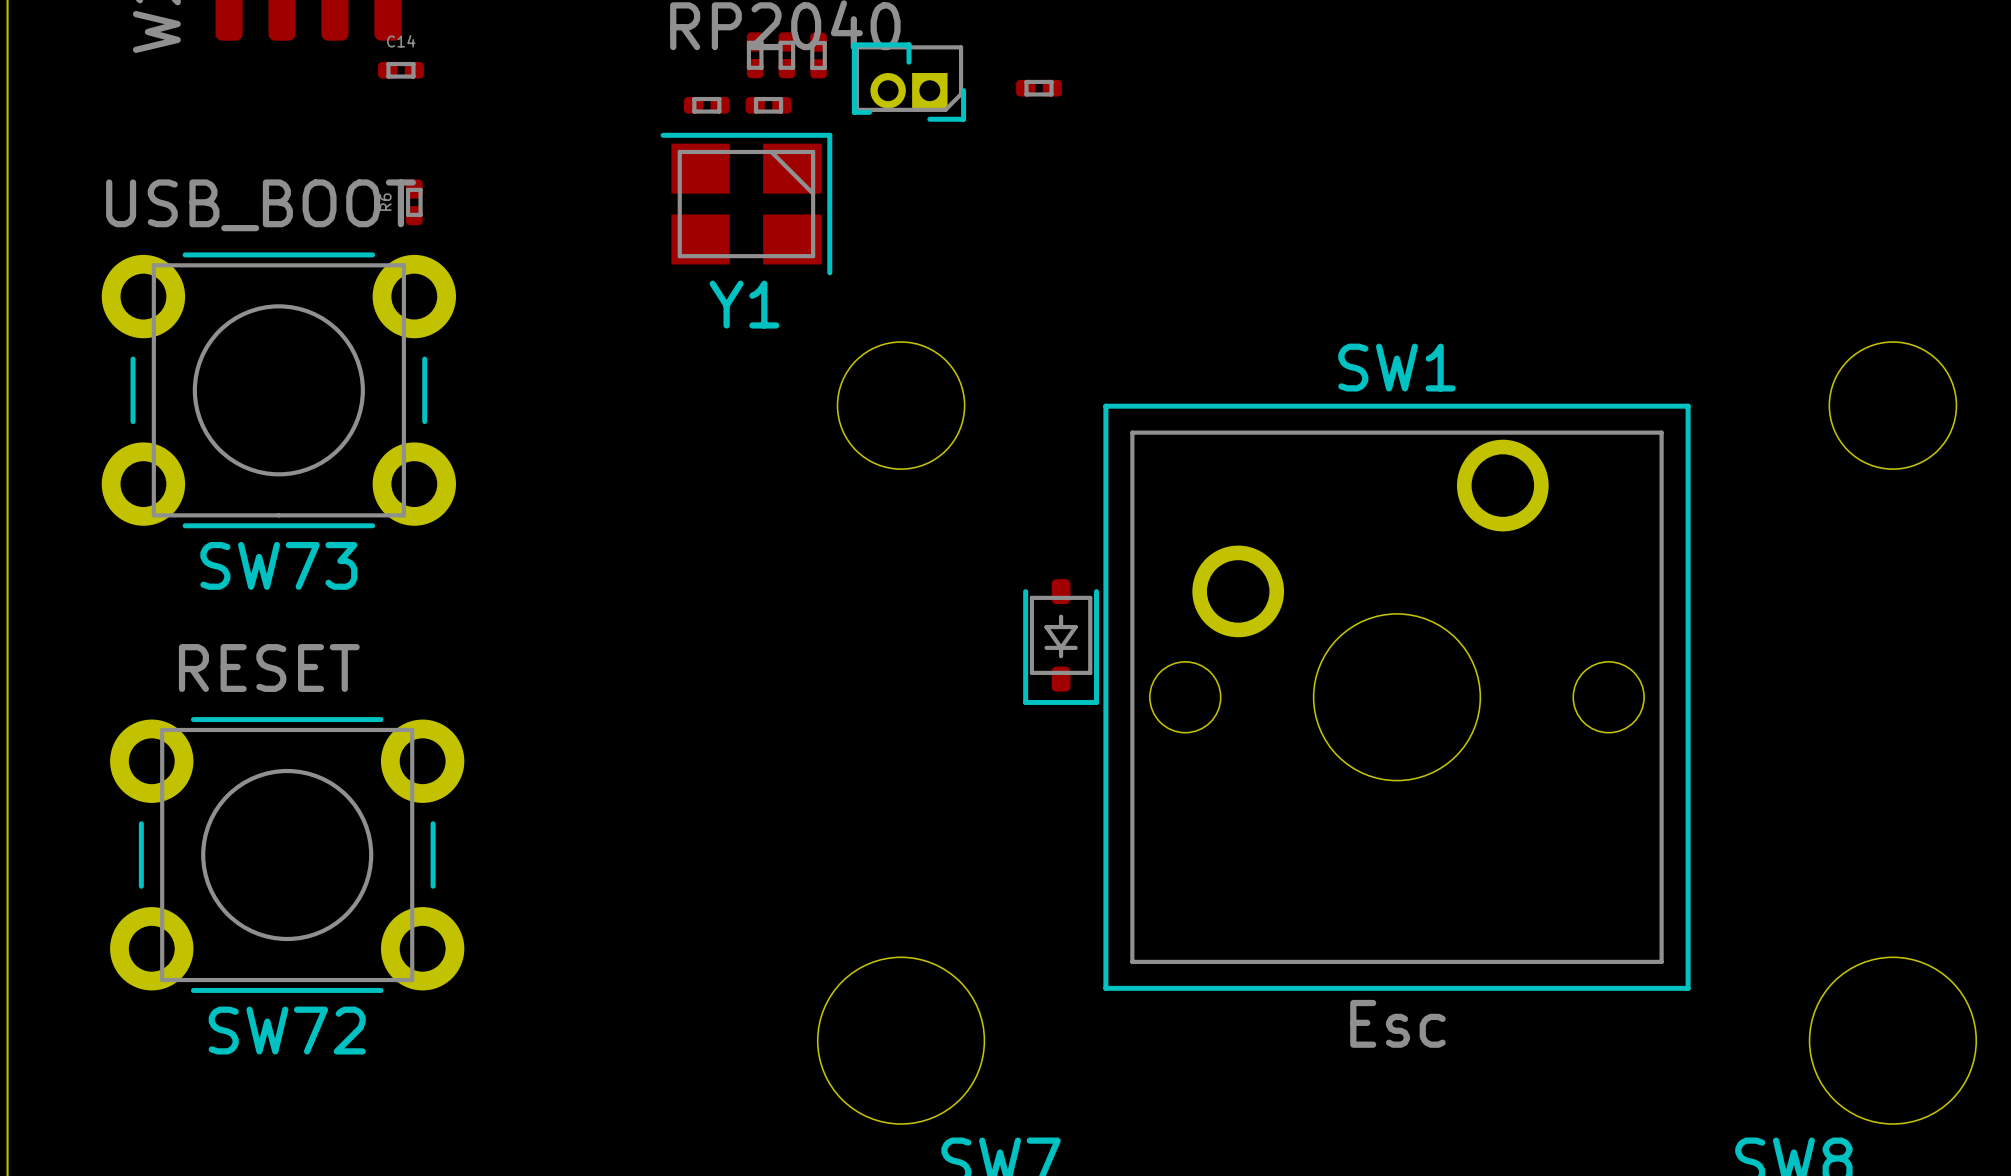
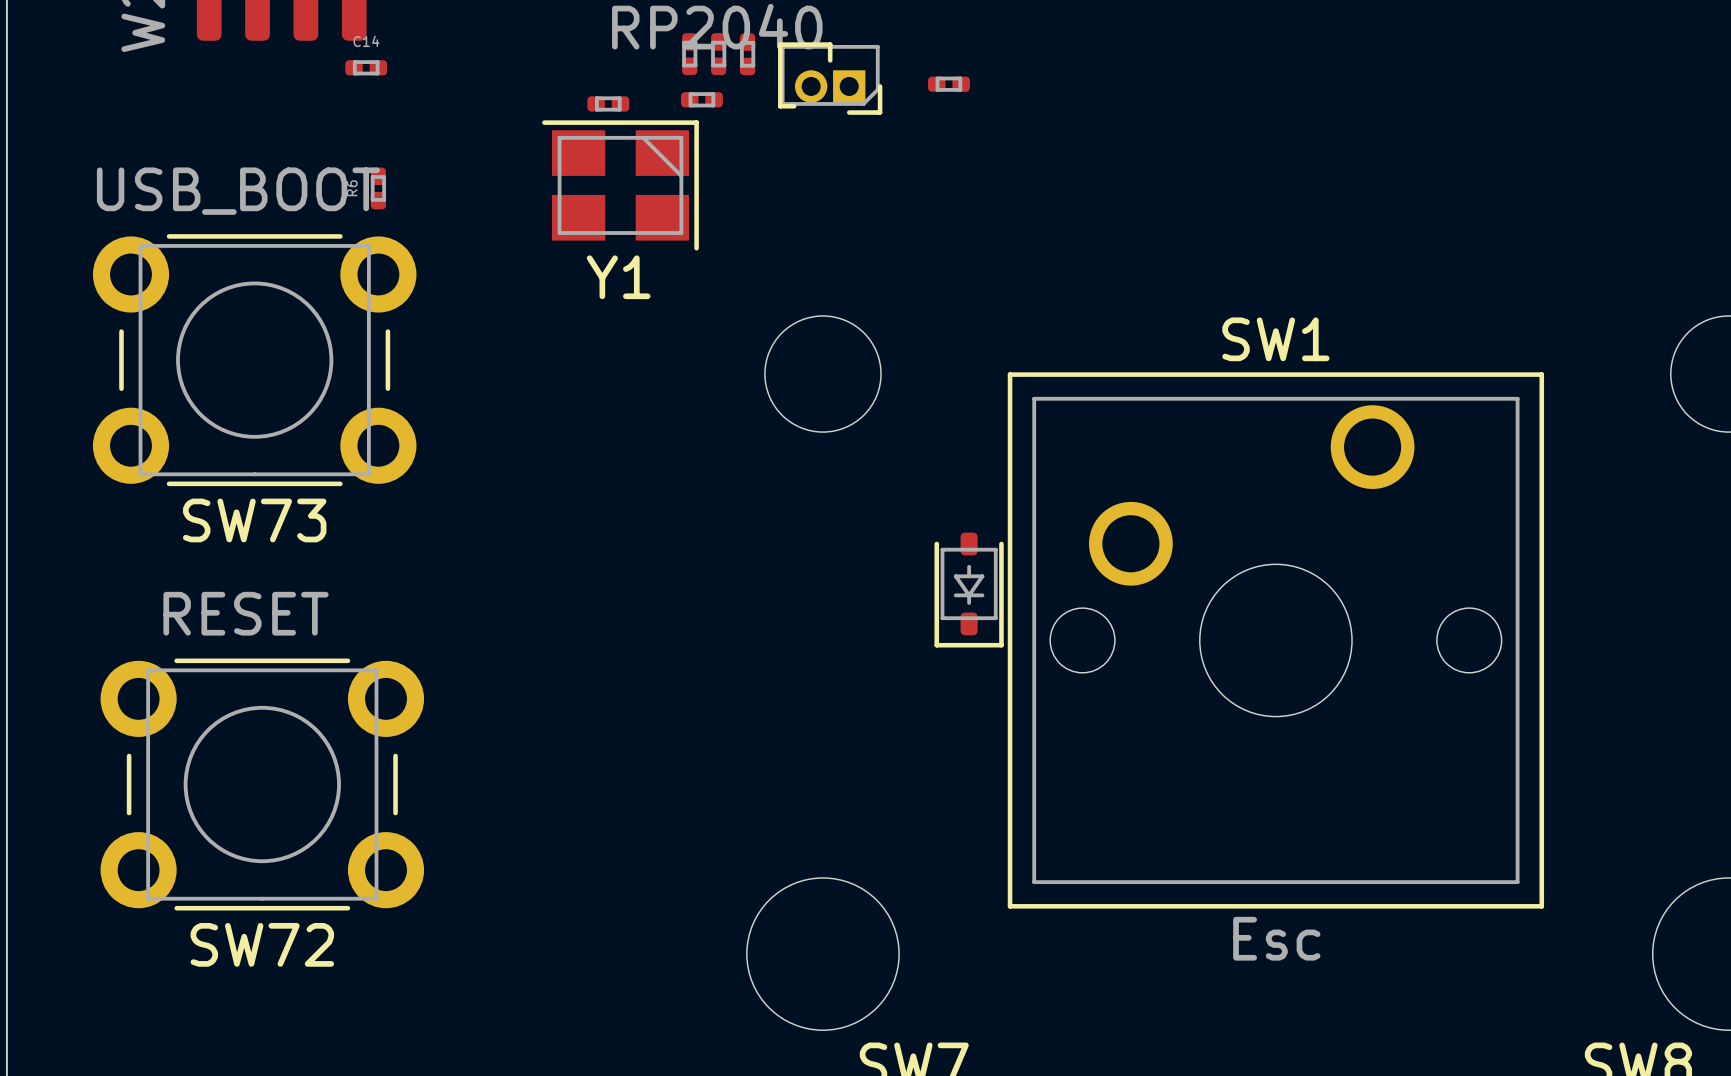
part position: (706, 105) -> (608, 103)
Y1 position: (746, 204) -> (620, 185)

